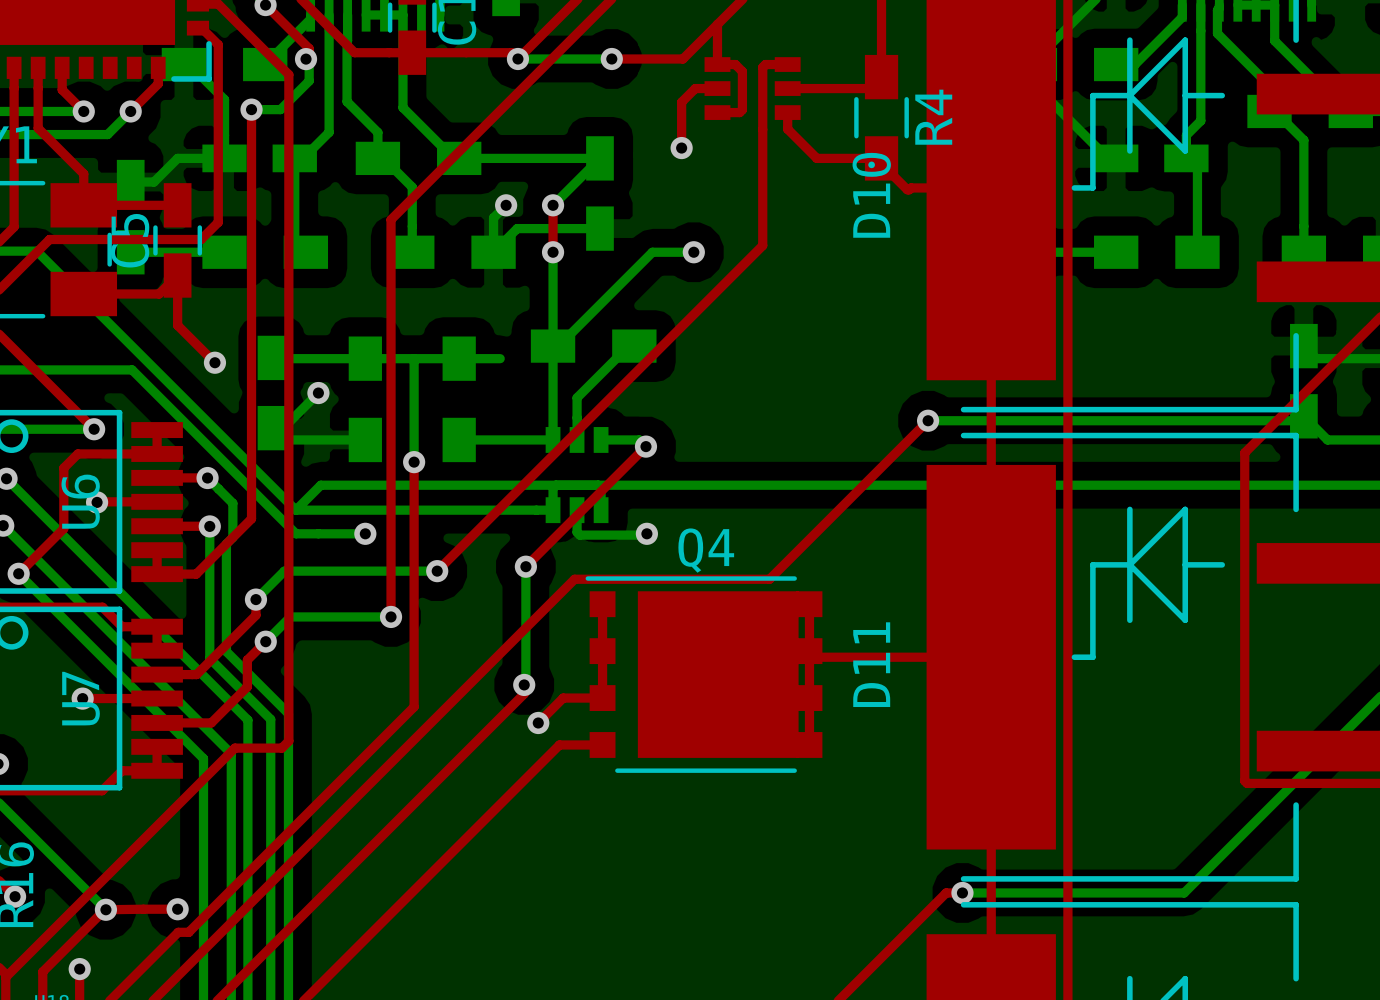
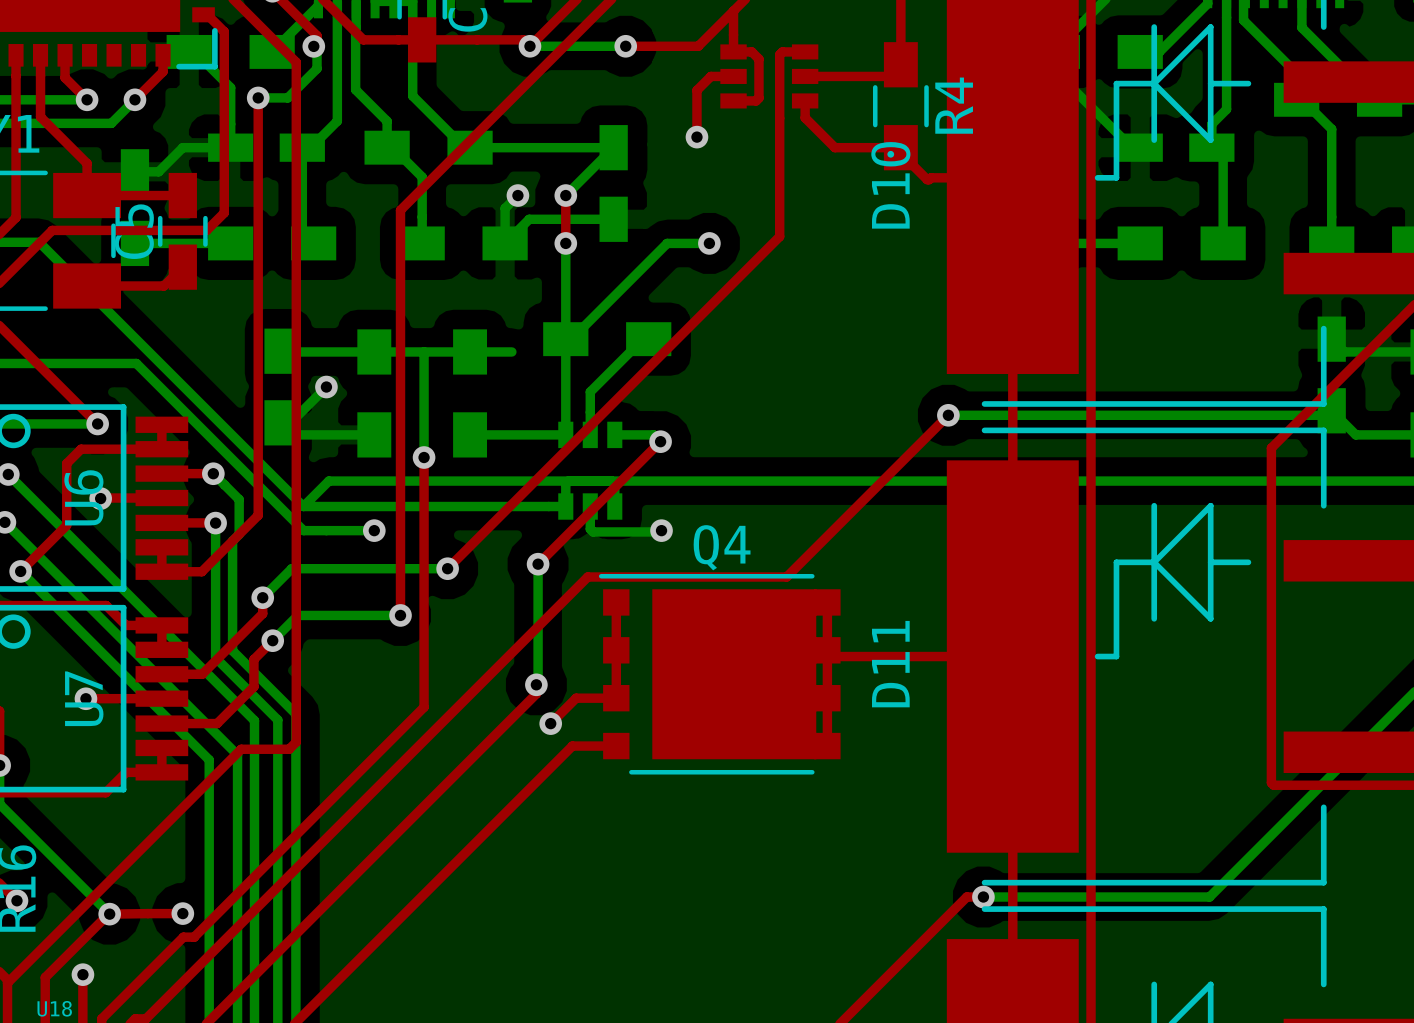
top track: (177, 275) (177, 325) (214, 362) -> none
via: (214, 362) -> none

